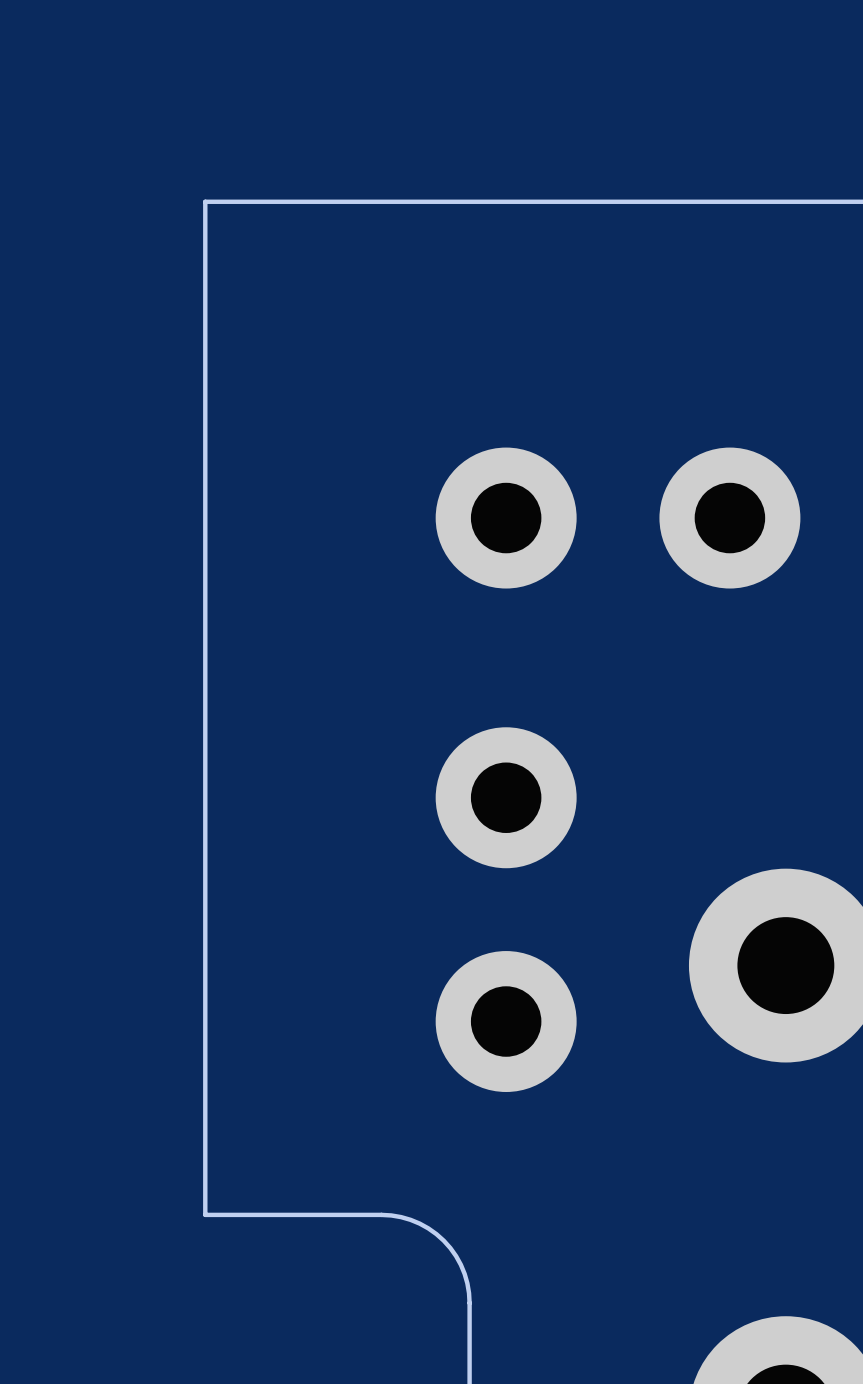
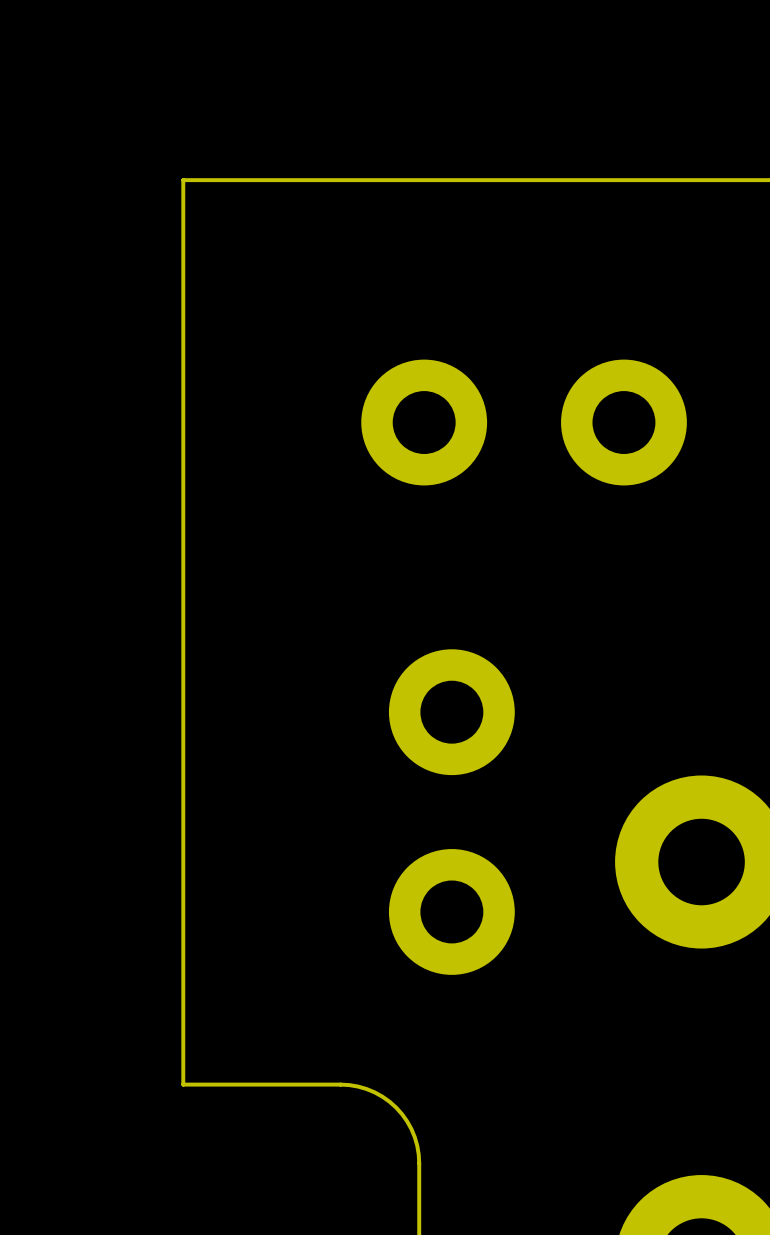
part position: (618, 518) -> (524, 422)

